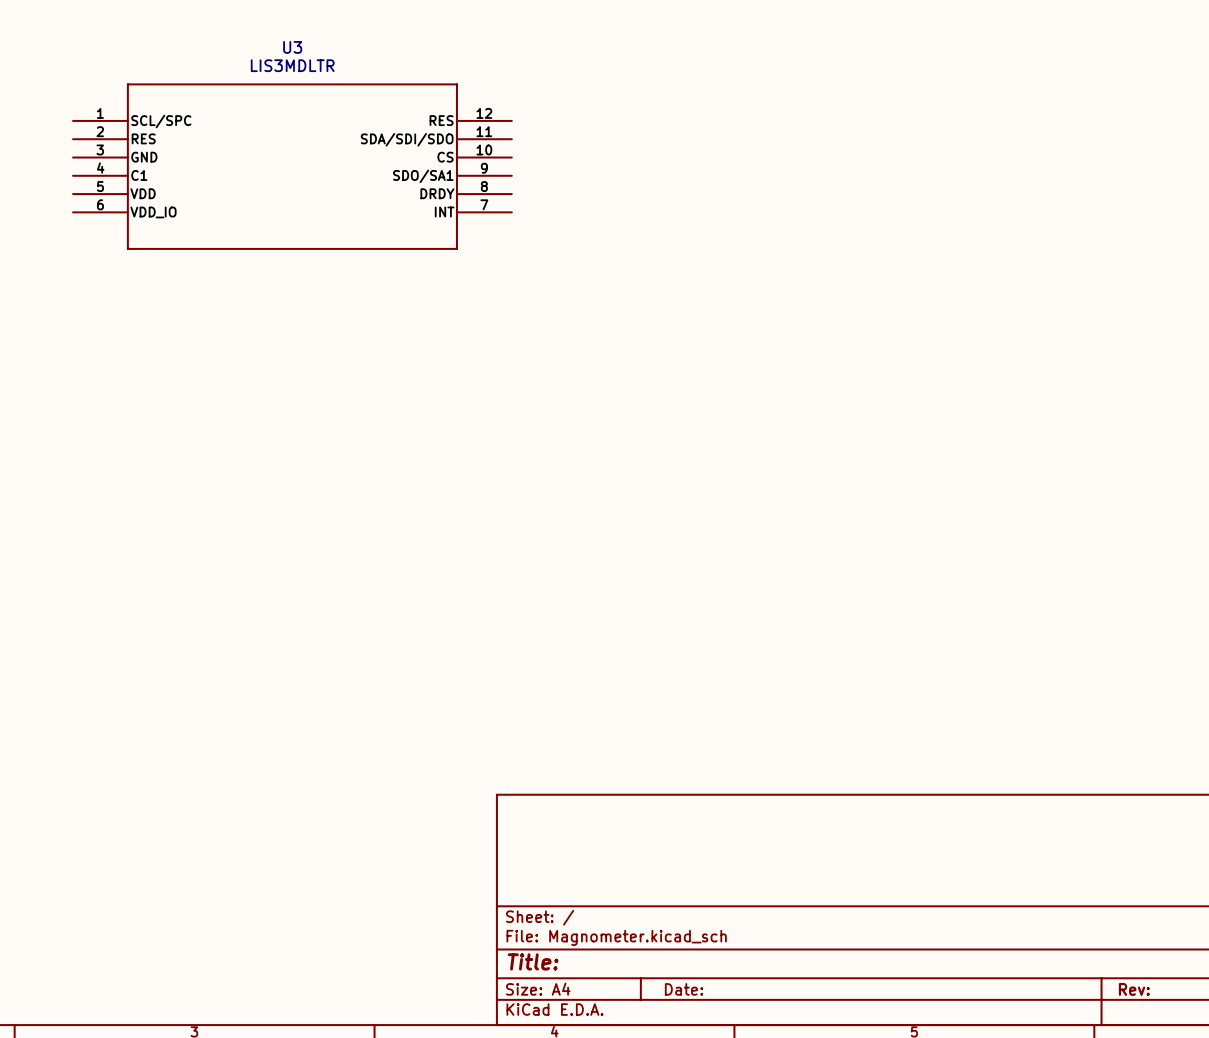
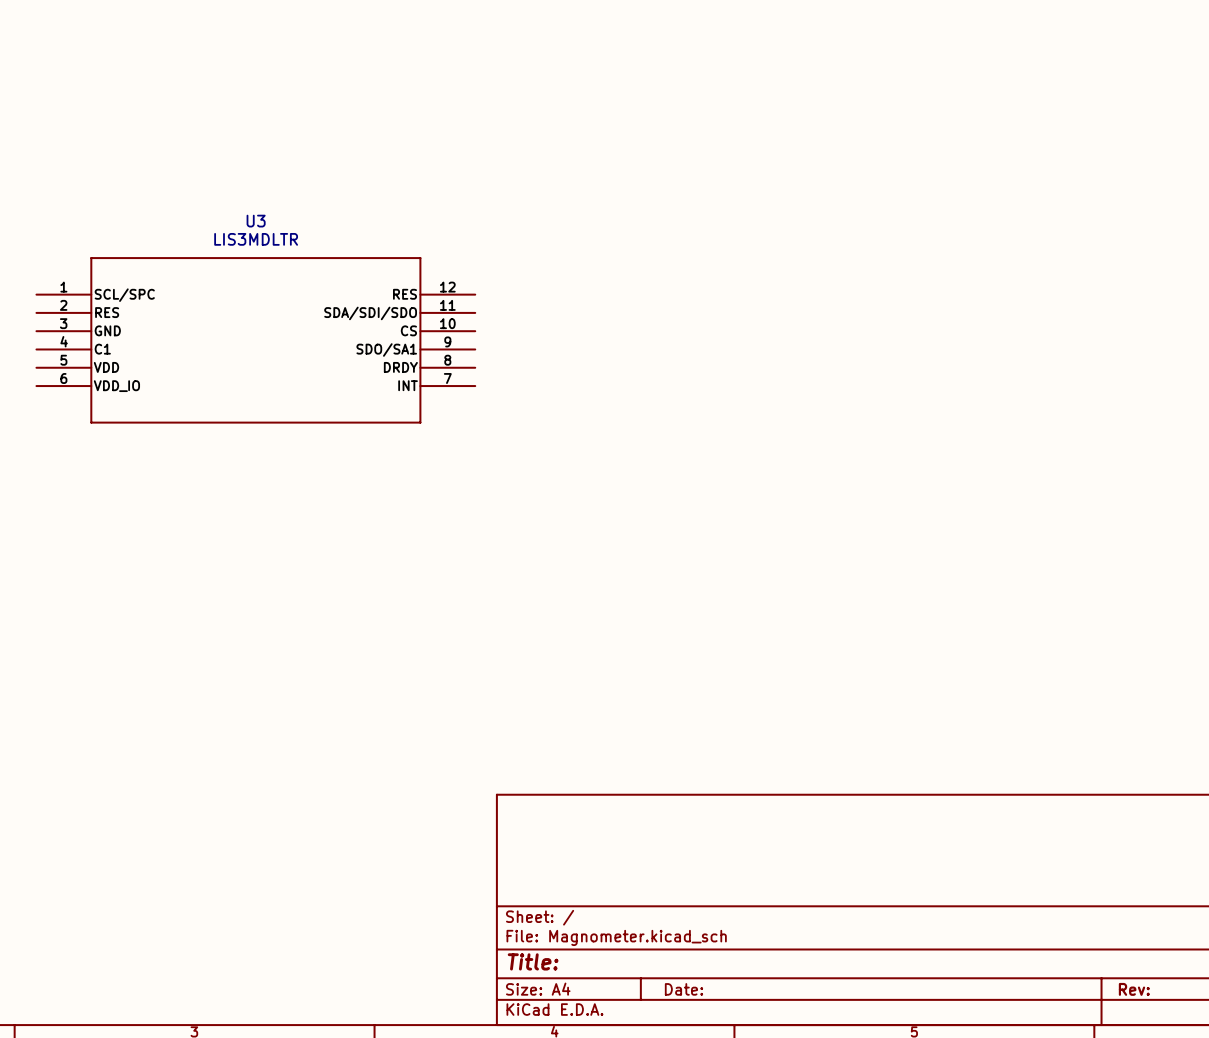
U3 position: (292, 166) -> (255, 340)

